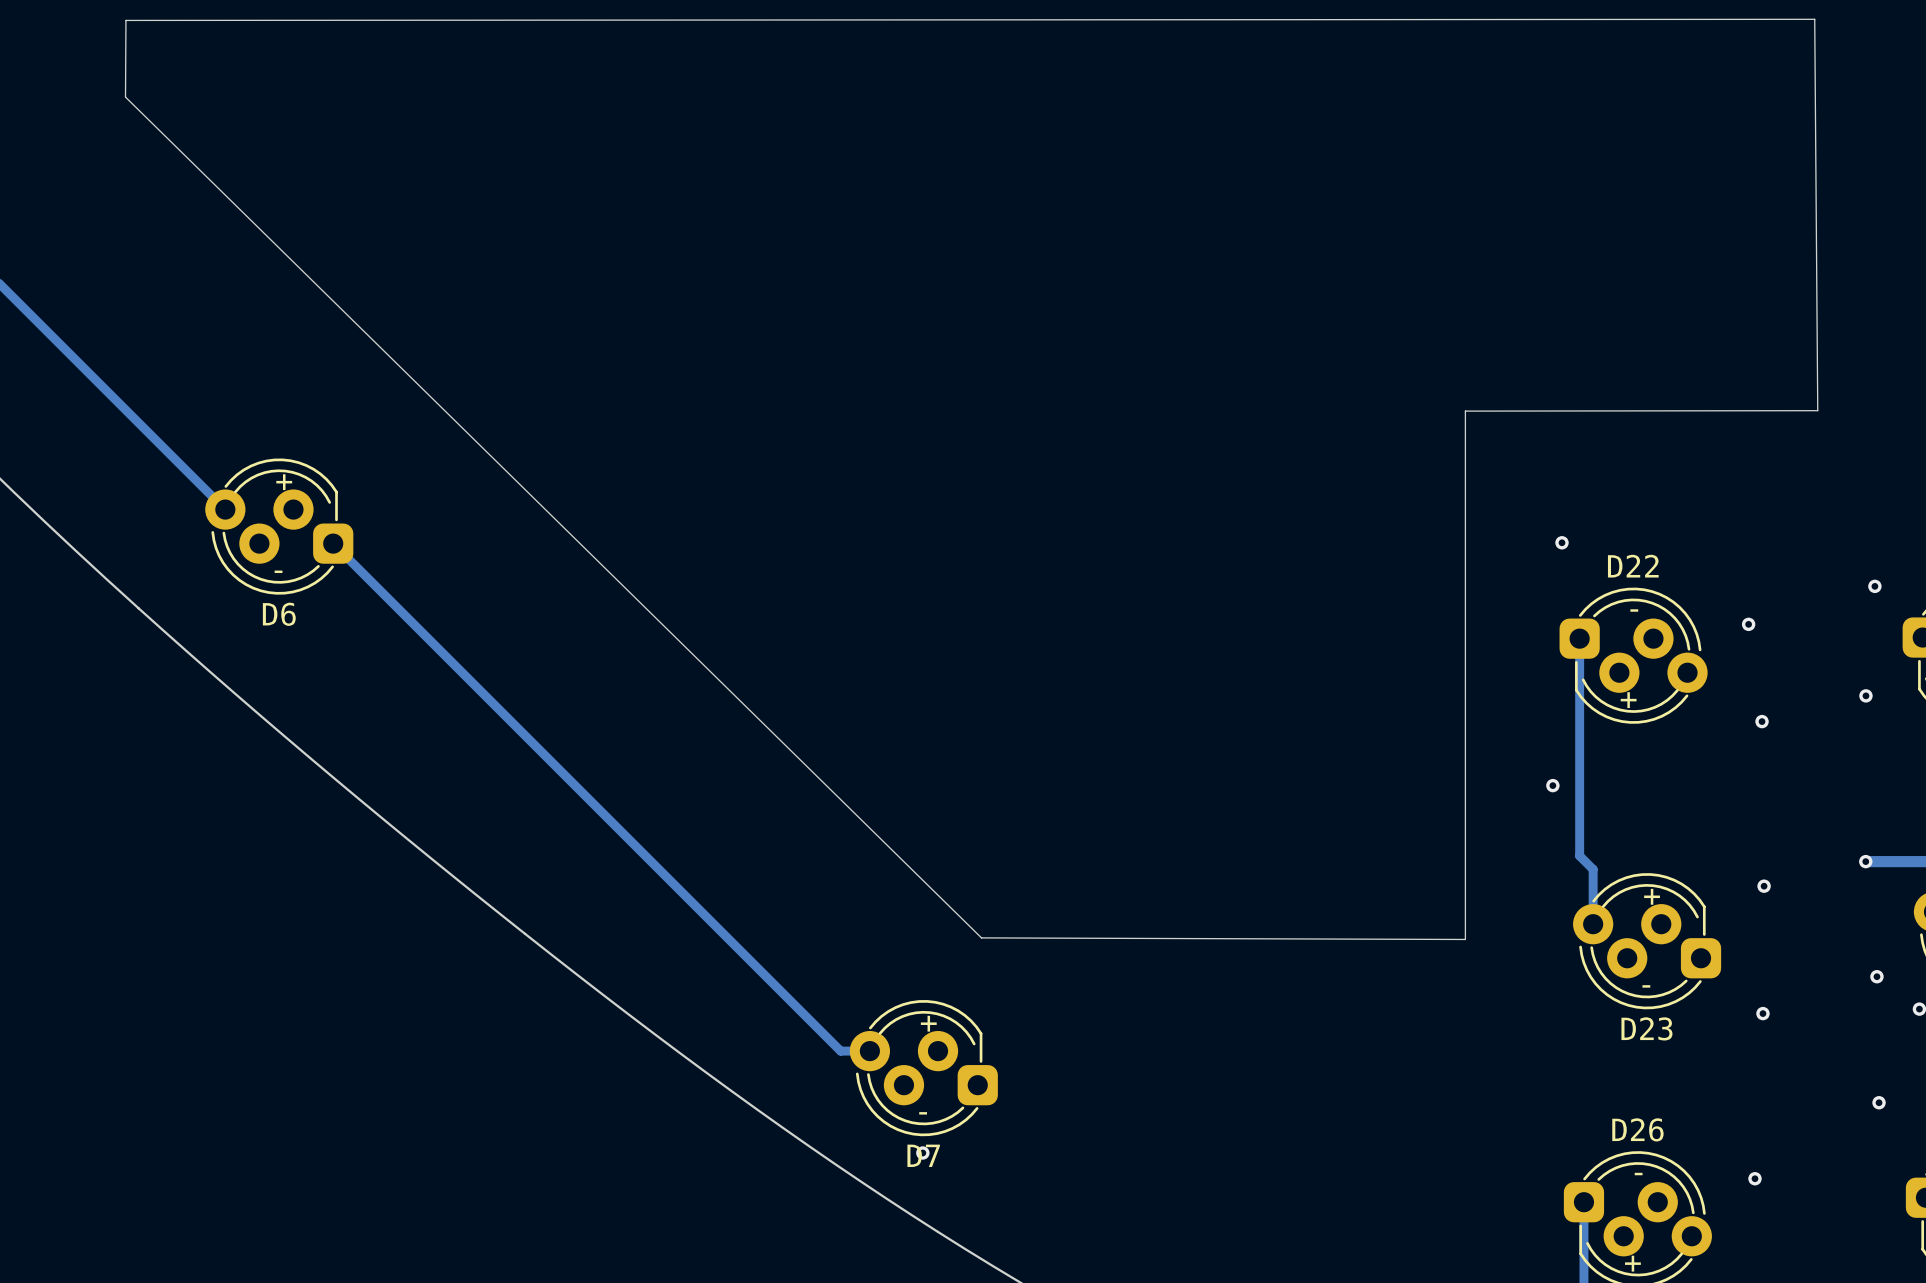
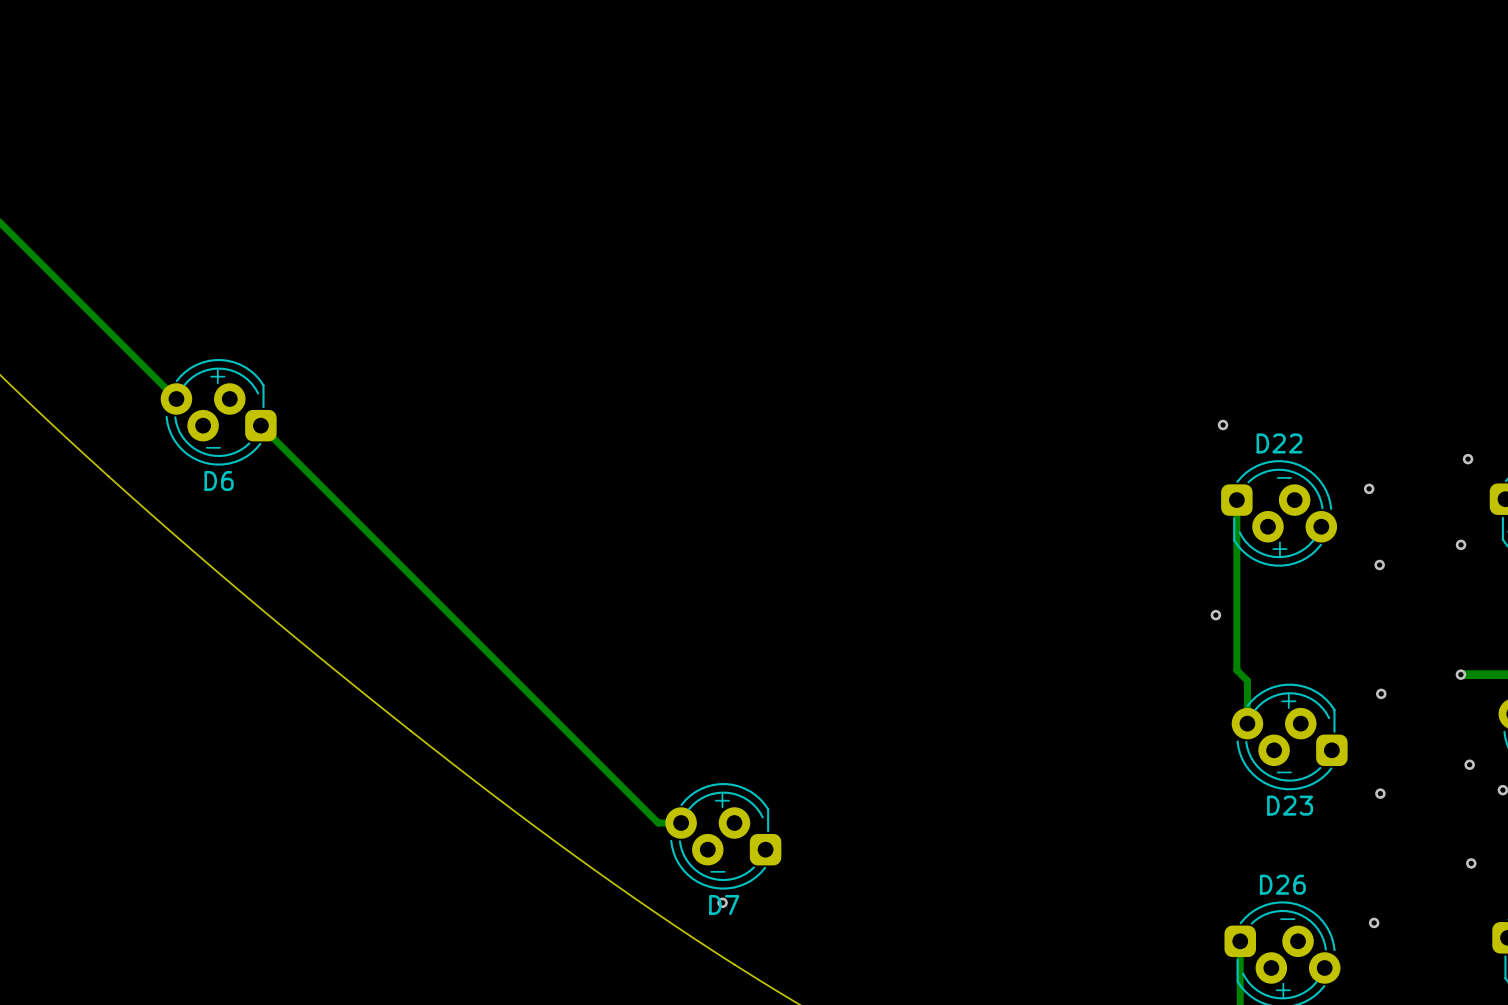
board edge: (1814, 19) (125, 20) (125, 97) (981, 937) (1465, 939) (1465, 411) (1817, 410) (1814, 19) -> none

